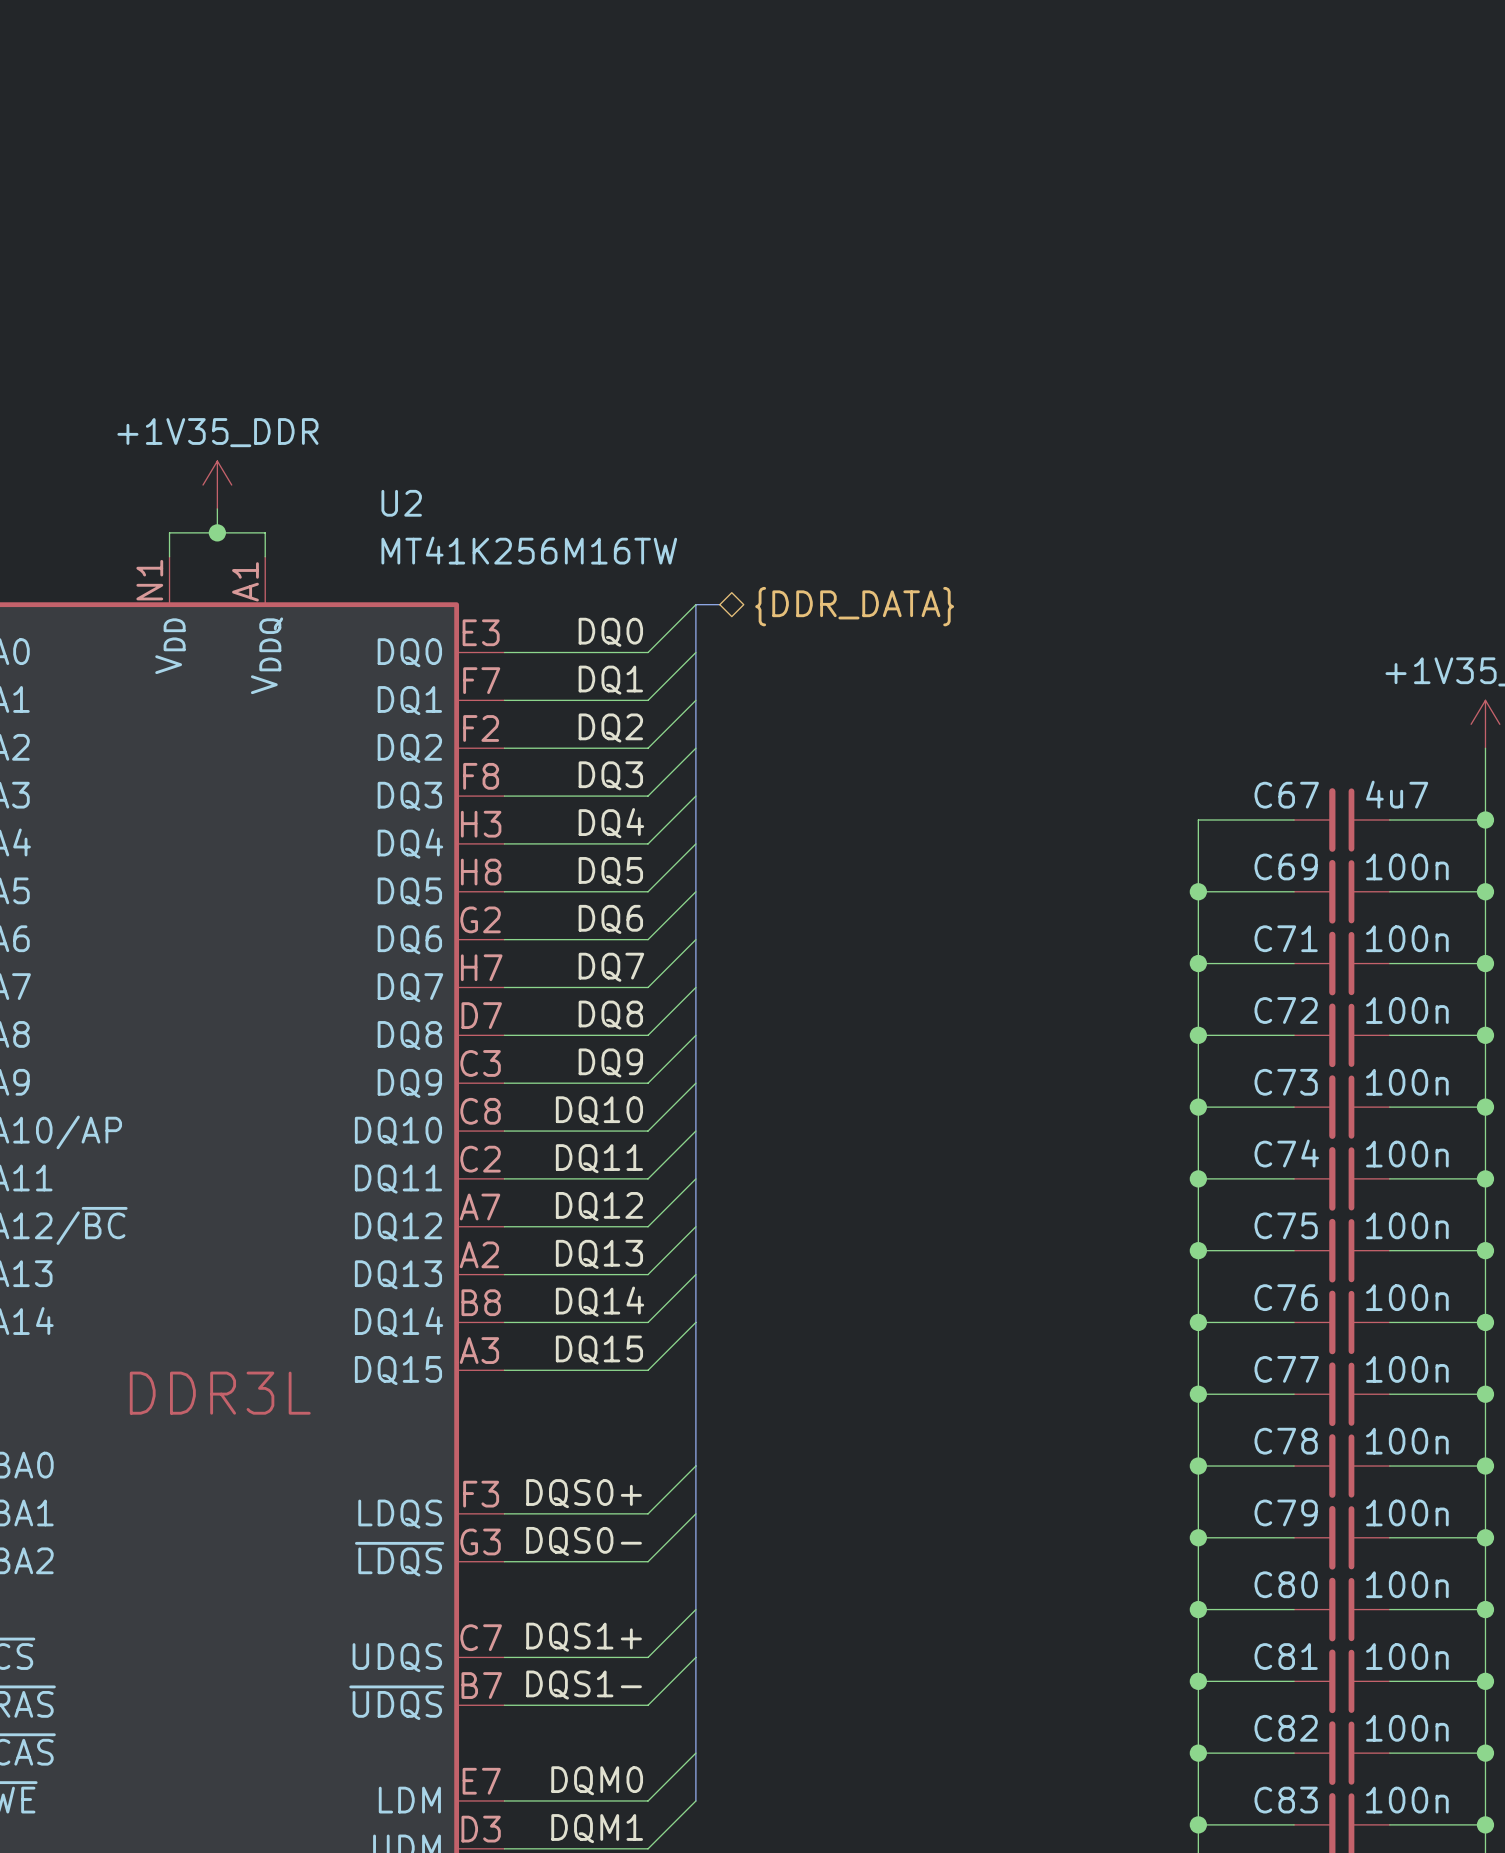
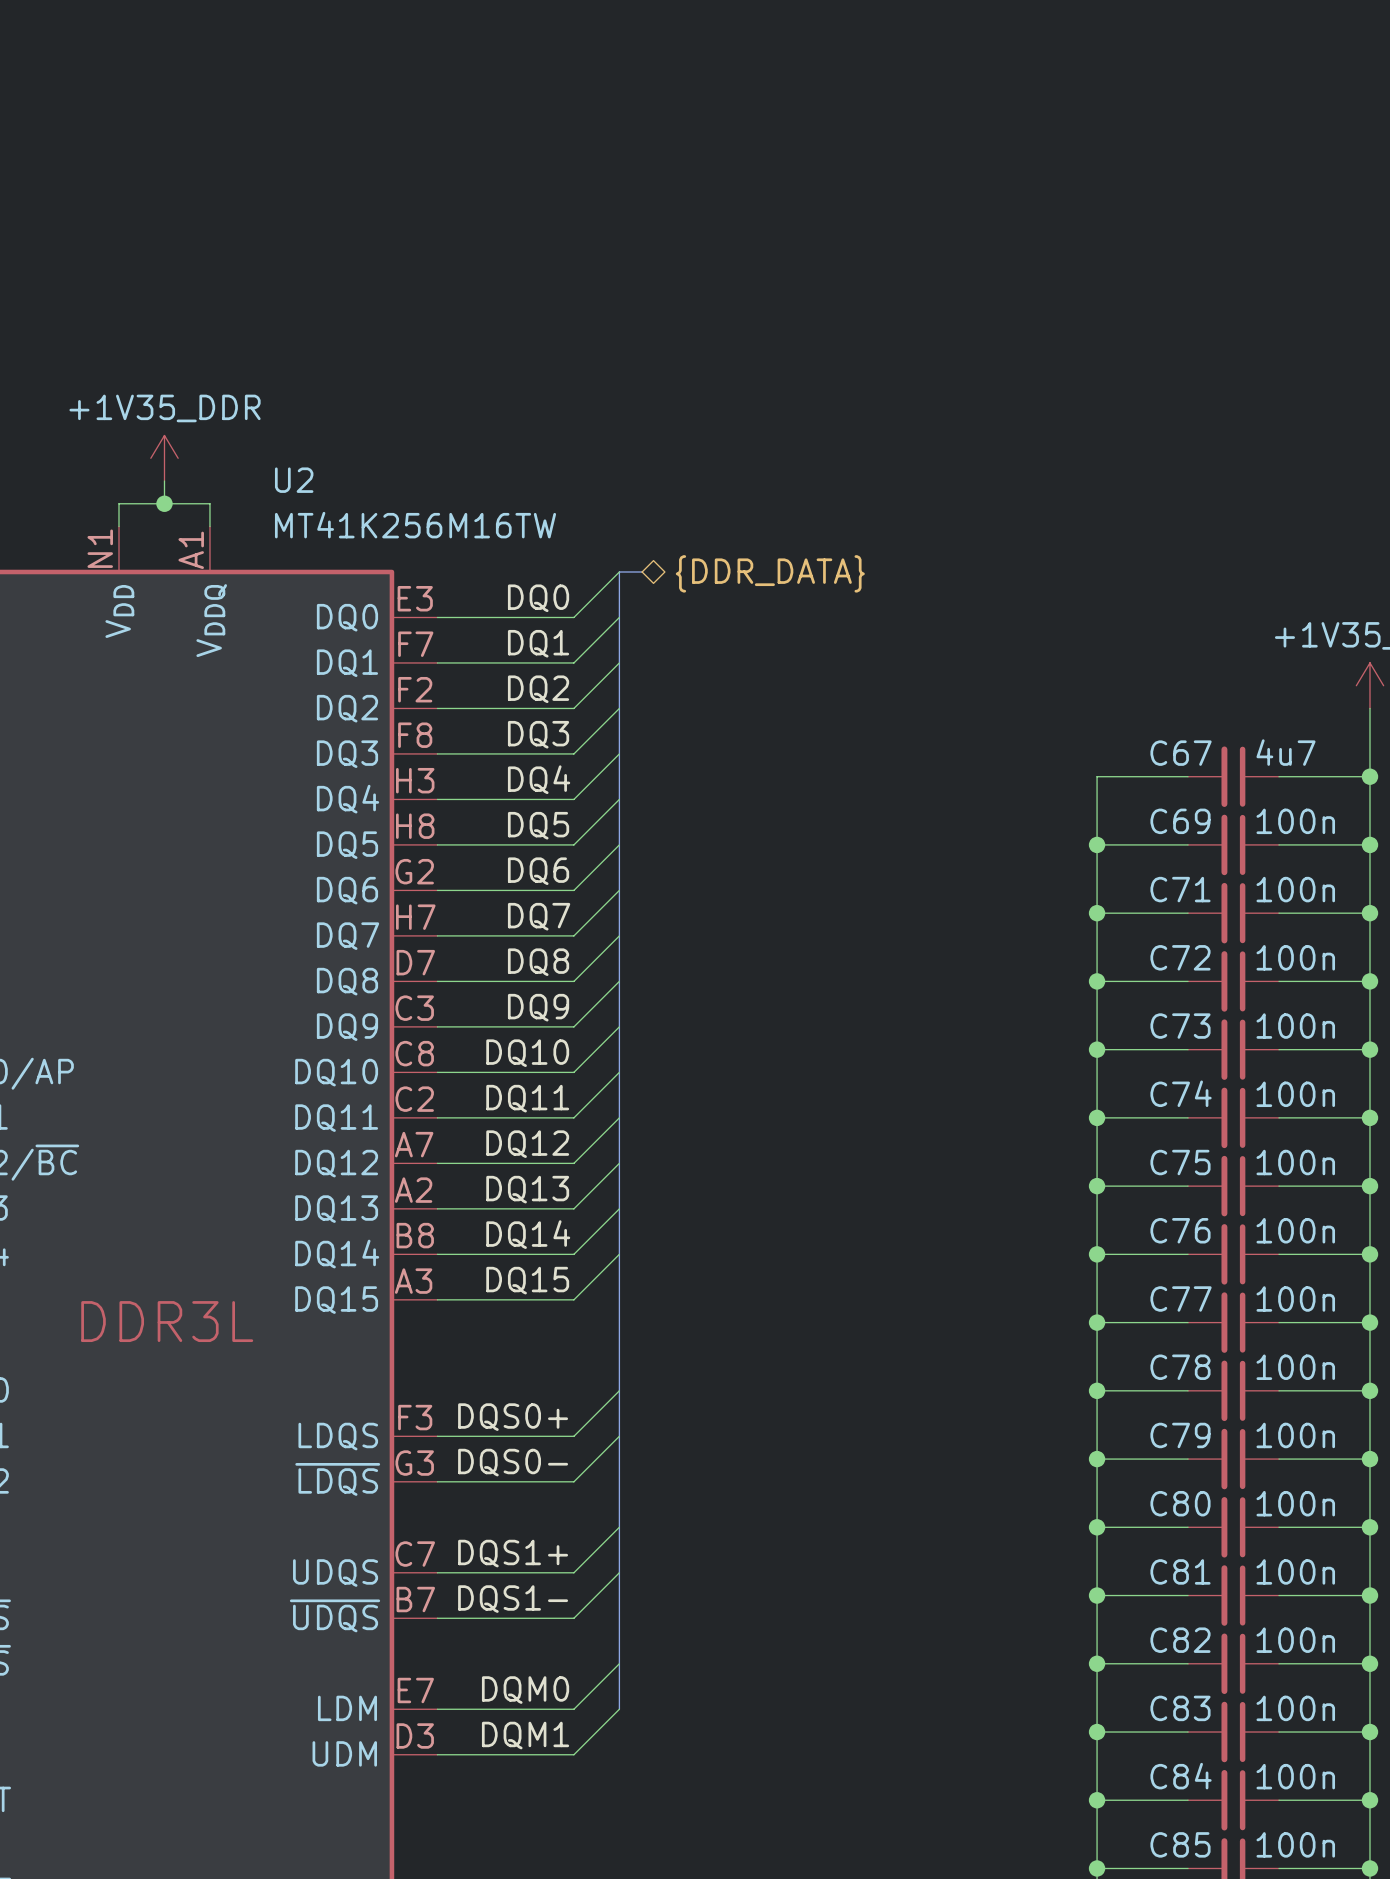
U2 name position: U2 (401, 503) -> U2 (294, 480)
U2 value position: MT41K256M16TW (529, 550) -> MT41K256M16TW (415, 525)

